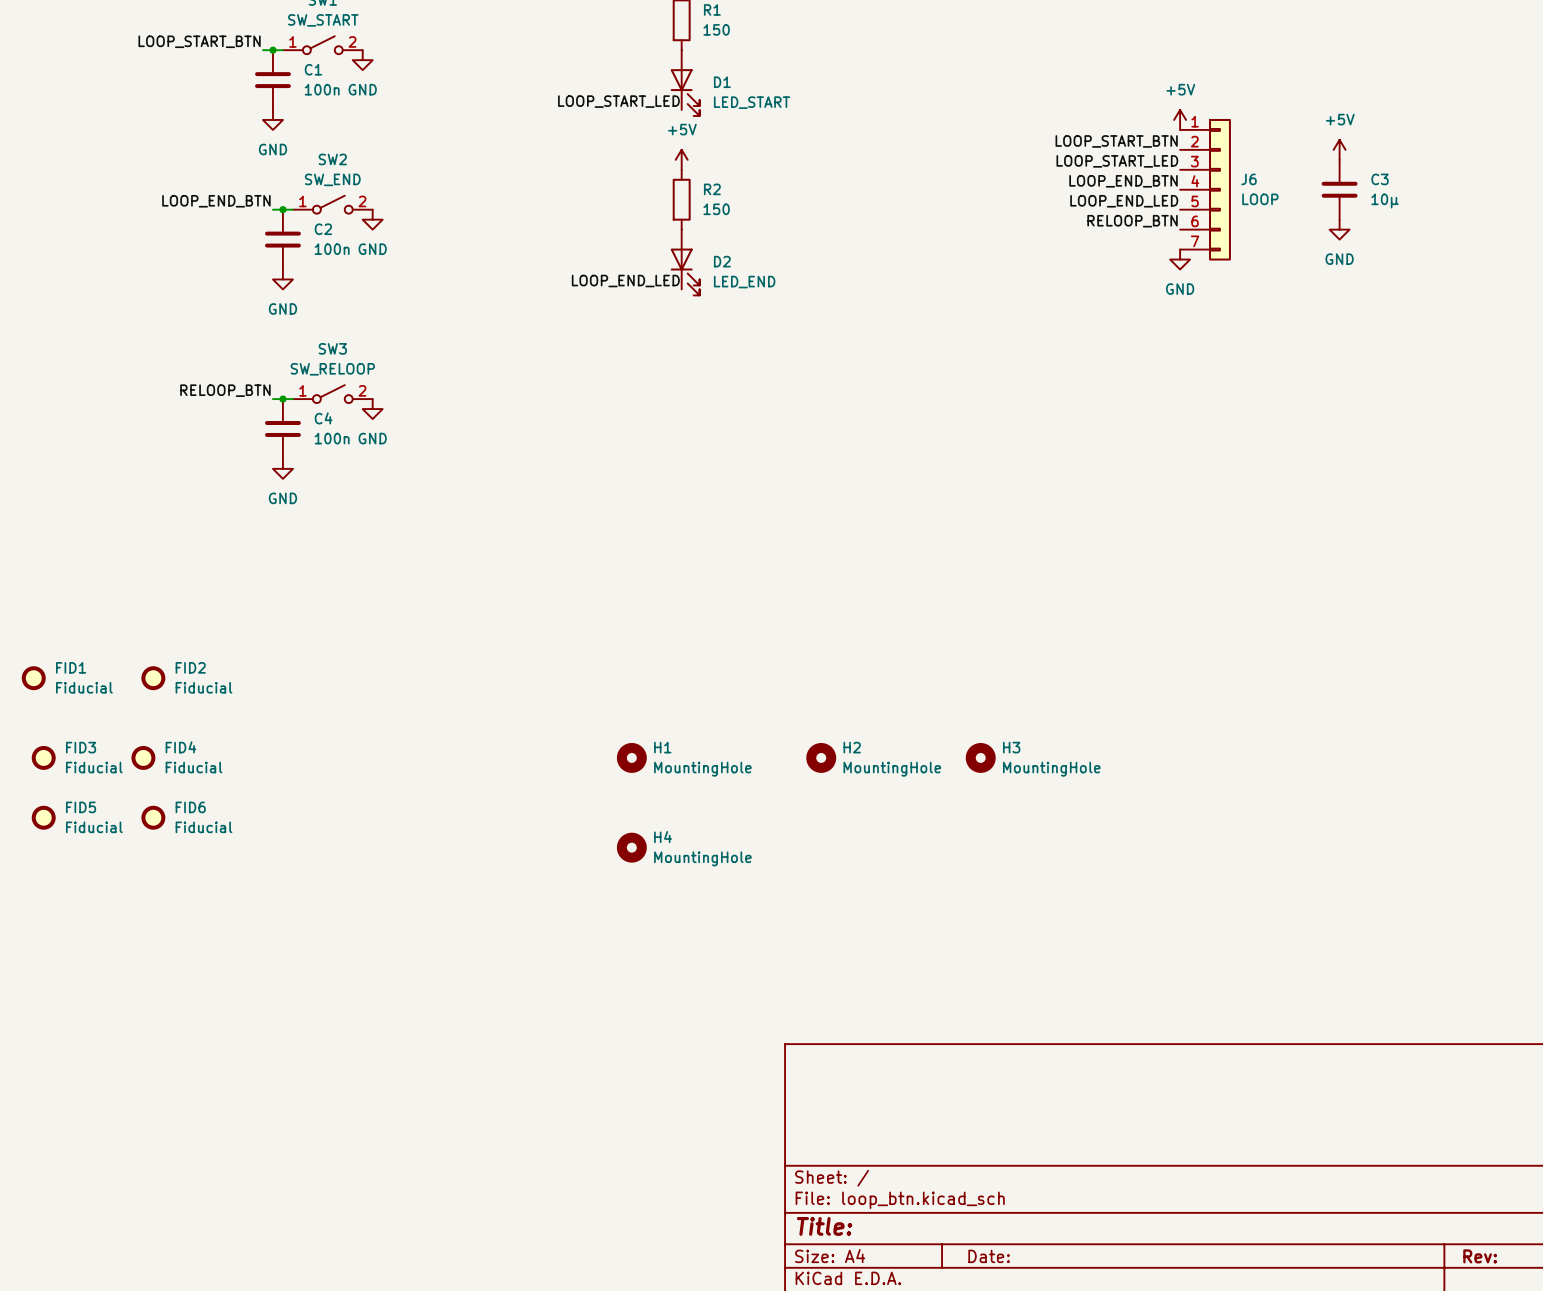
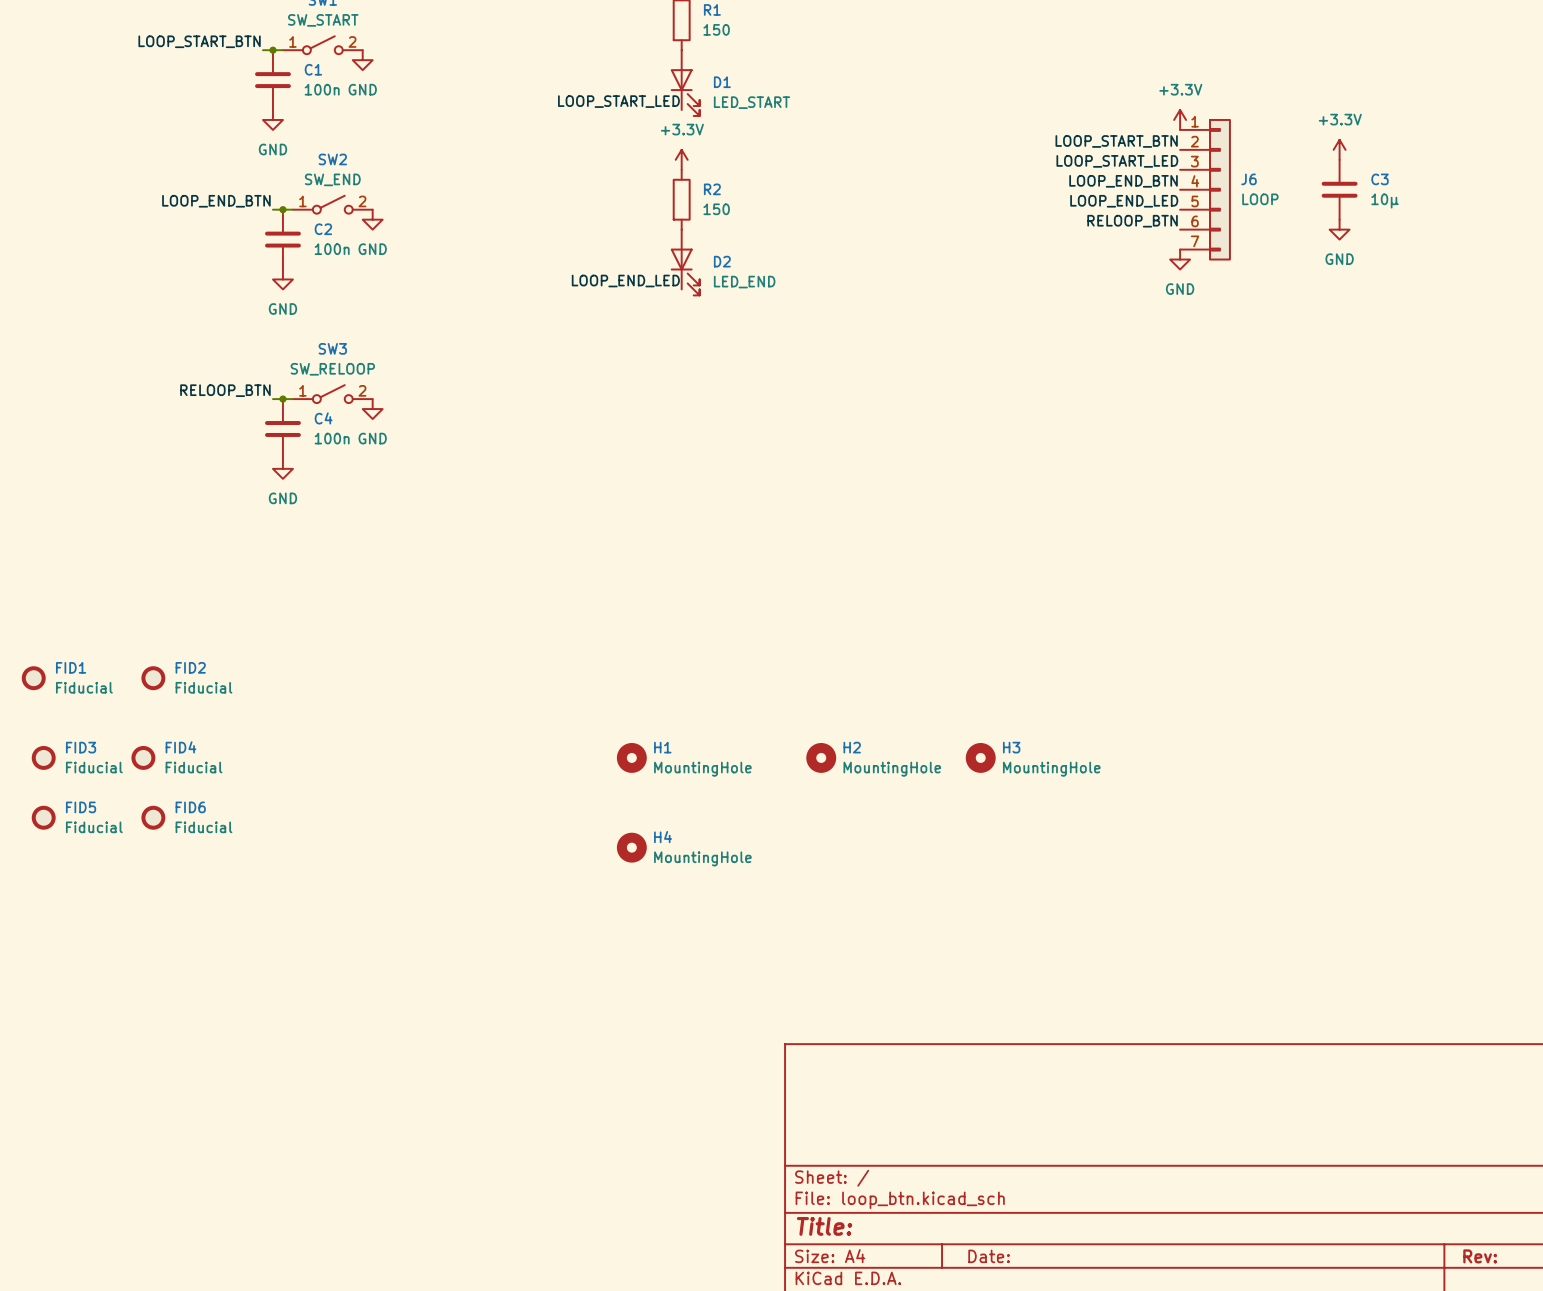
power symbol: +5V (1180, 119) -> +3.3V (1180, 119)
power symbol: +5V (1339, 149) -> +3.3V (1339, 149)
power symbol: +5V (681, 159) -> +3.3V (681, 159)

